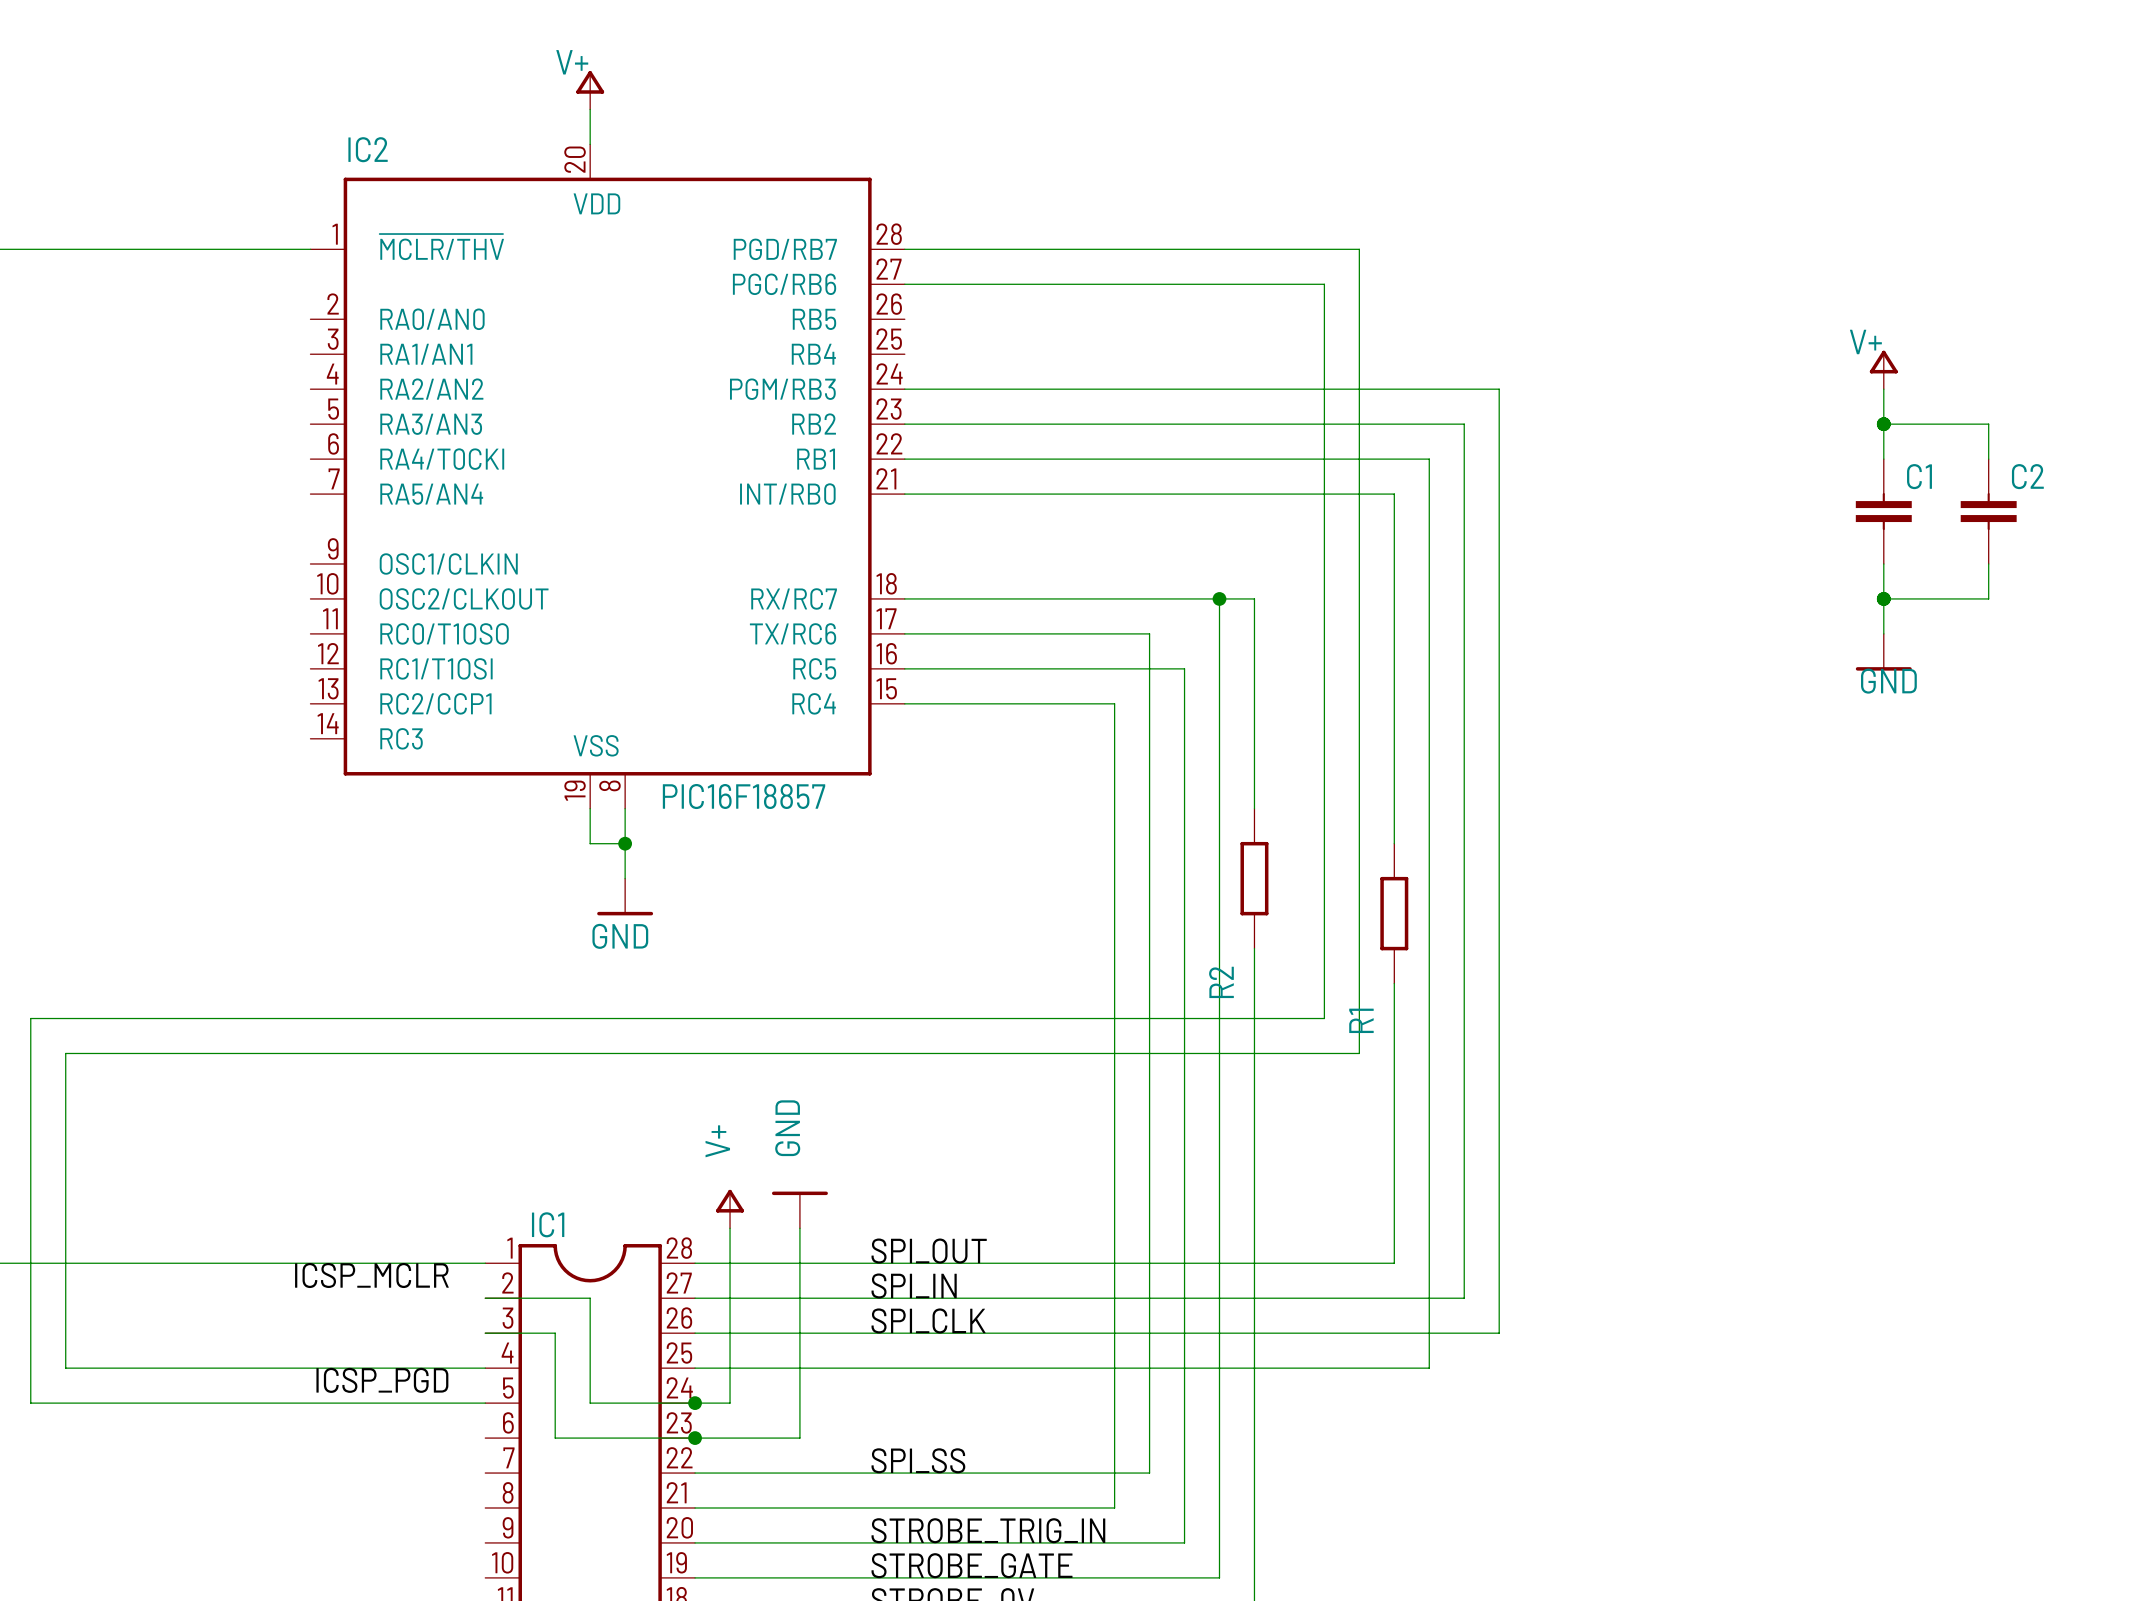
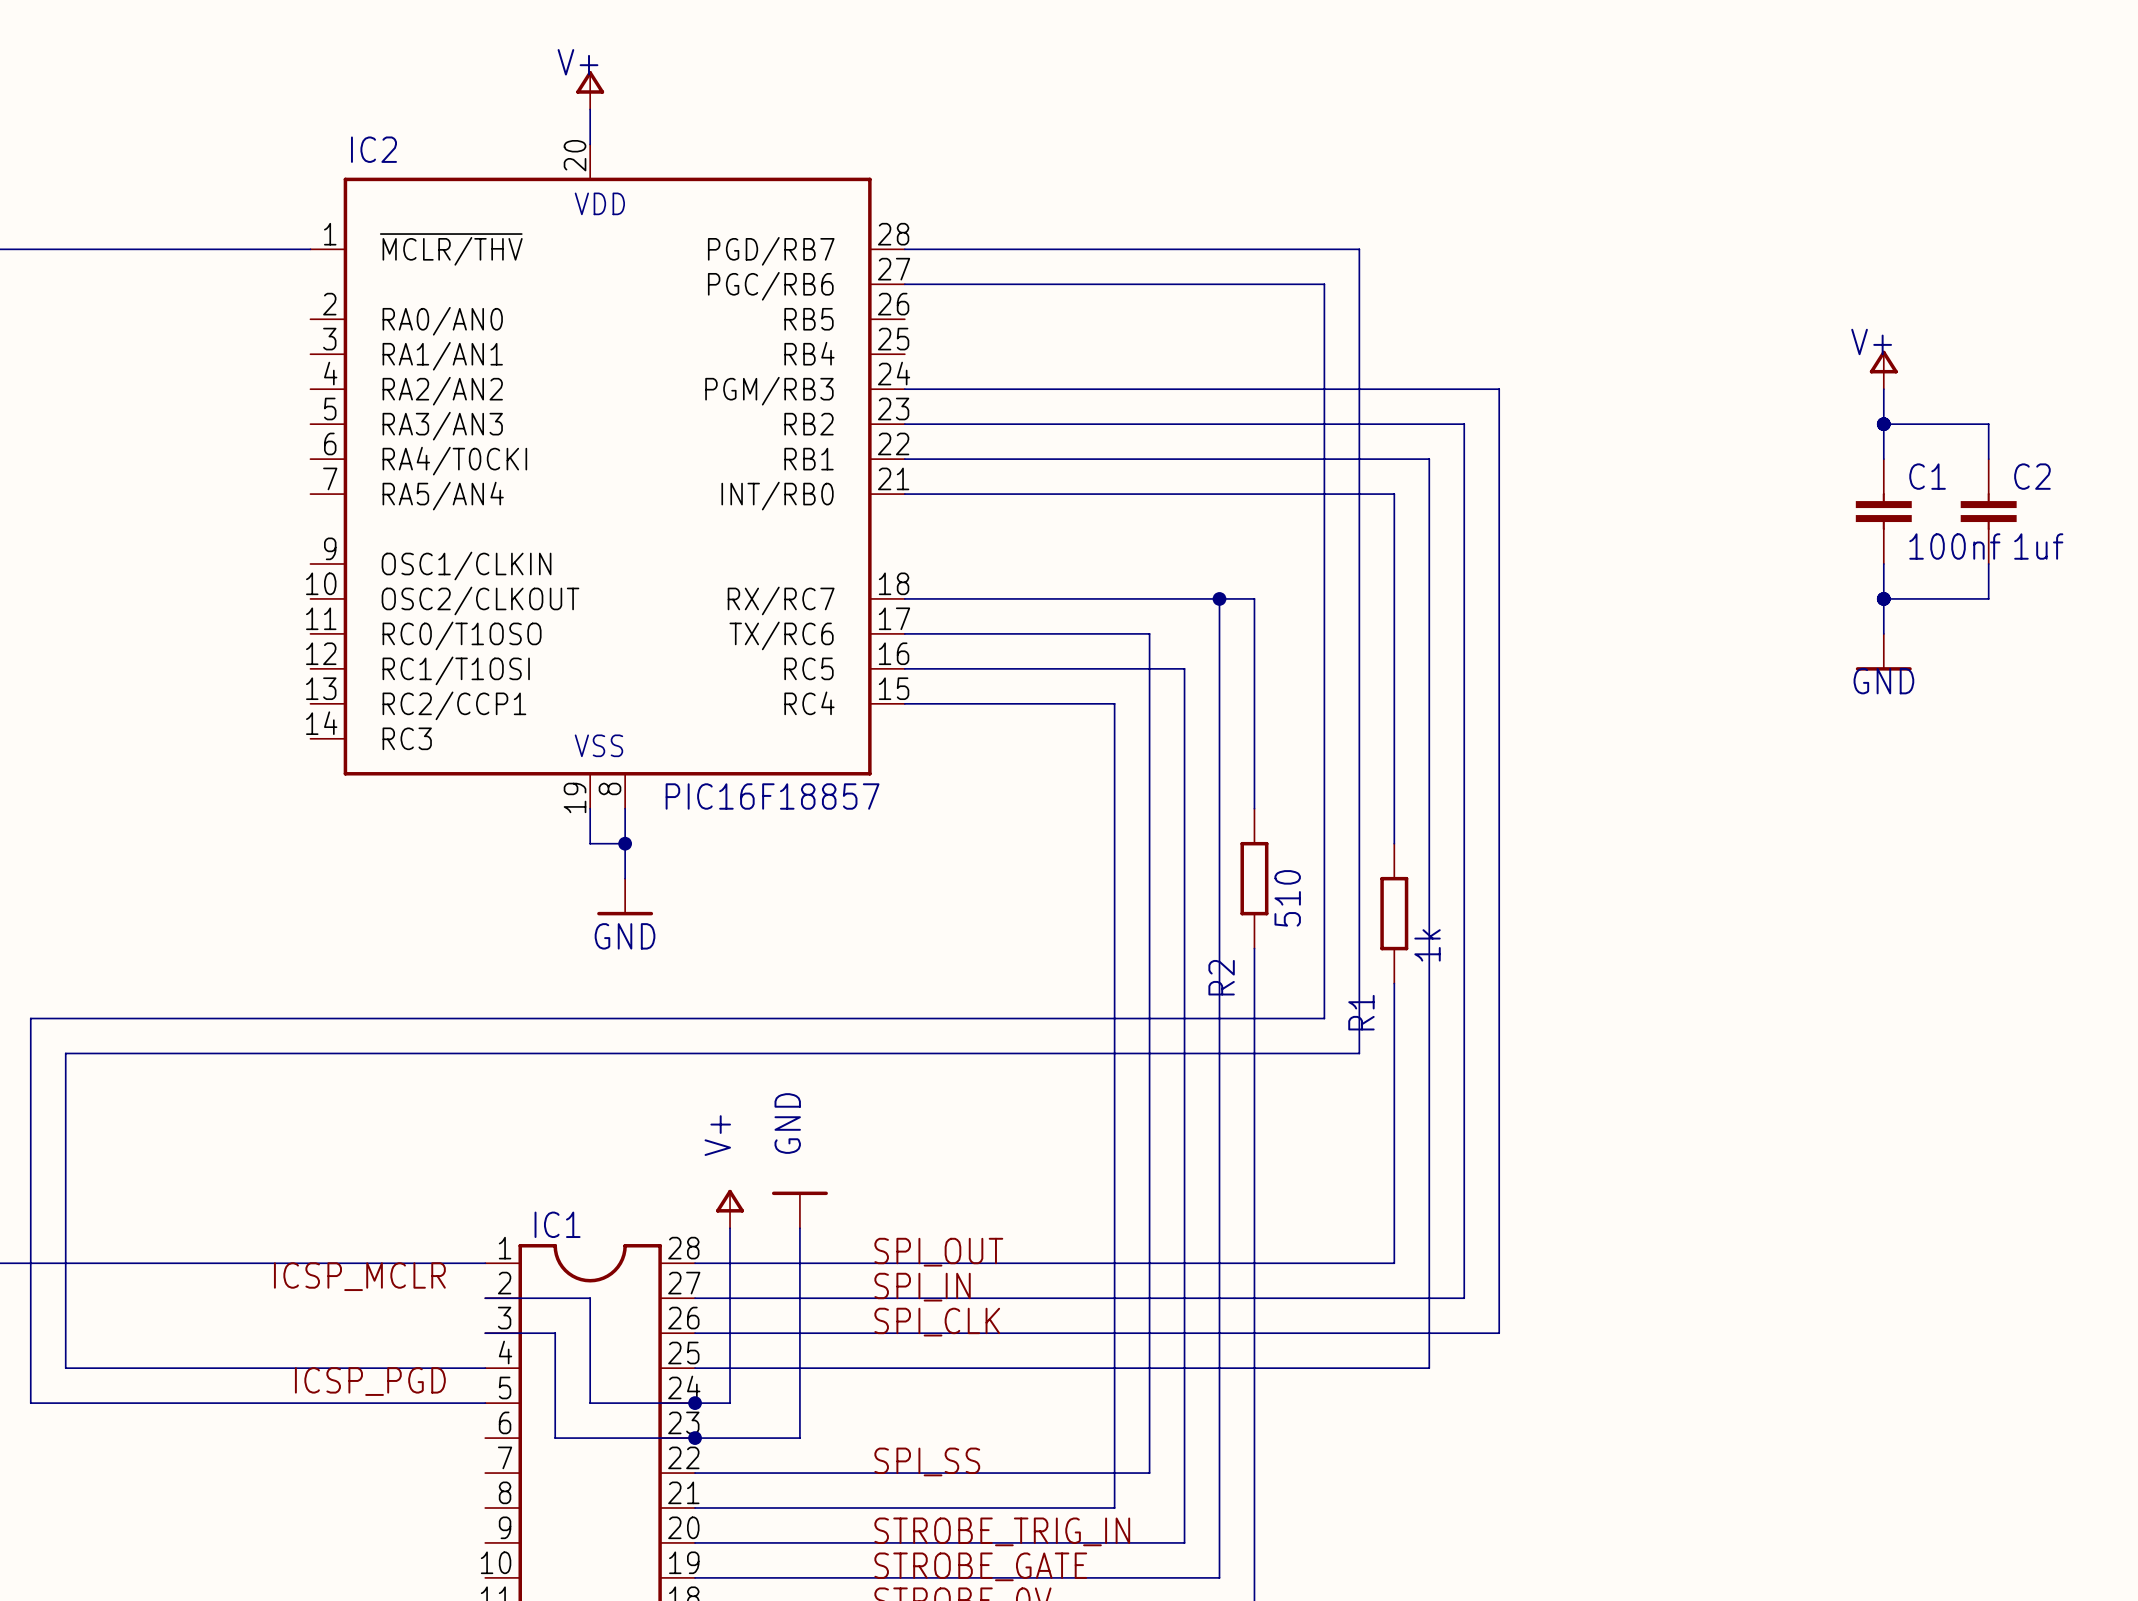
C1 value: none -> 100nf (1954, 546)
C2 value: none -> 1uf (2038, 546)
R2 value: none -> 510 (1287, 898)
R1 value: none -> 1k (1427, 945)

